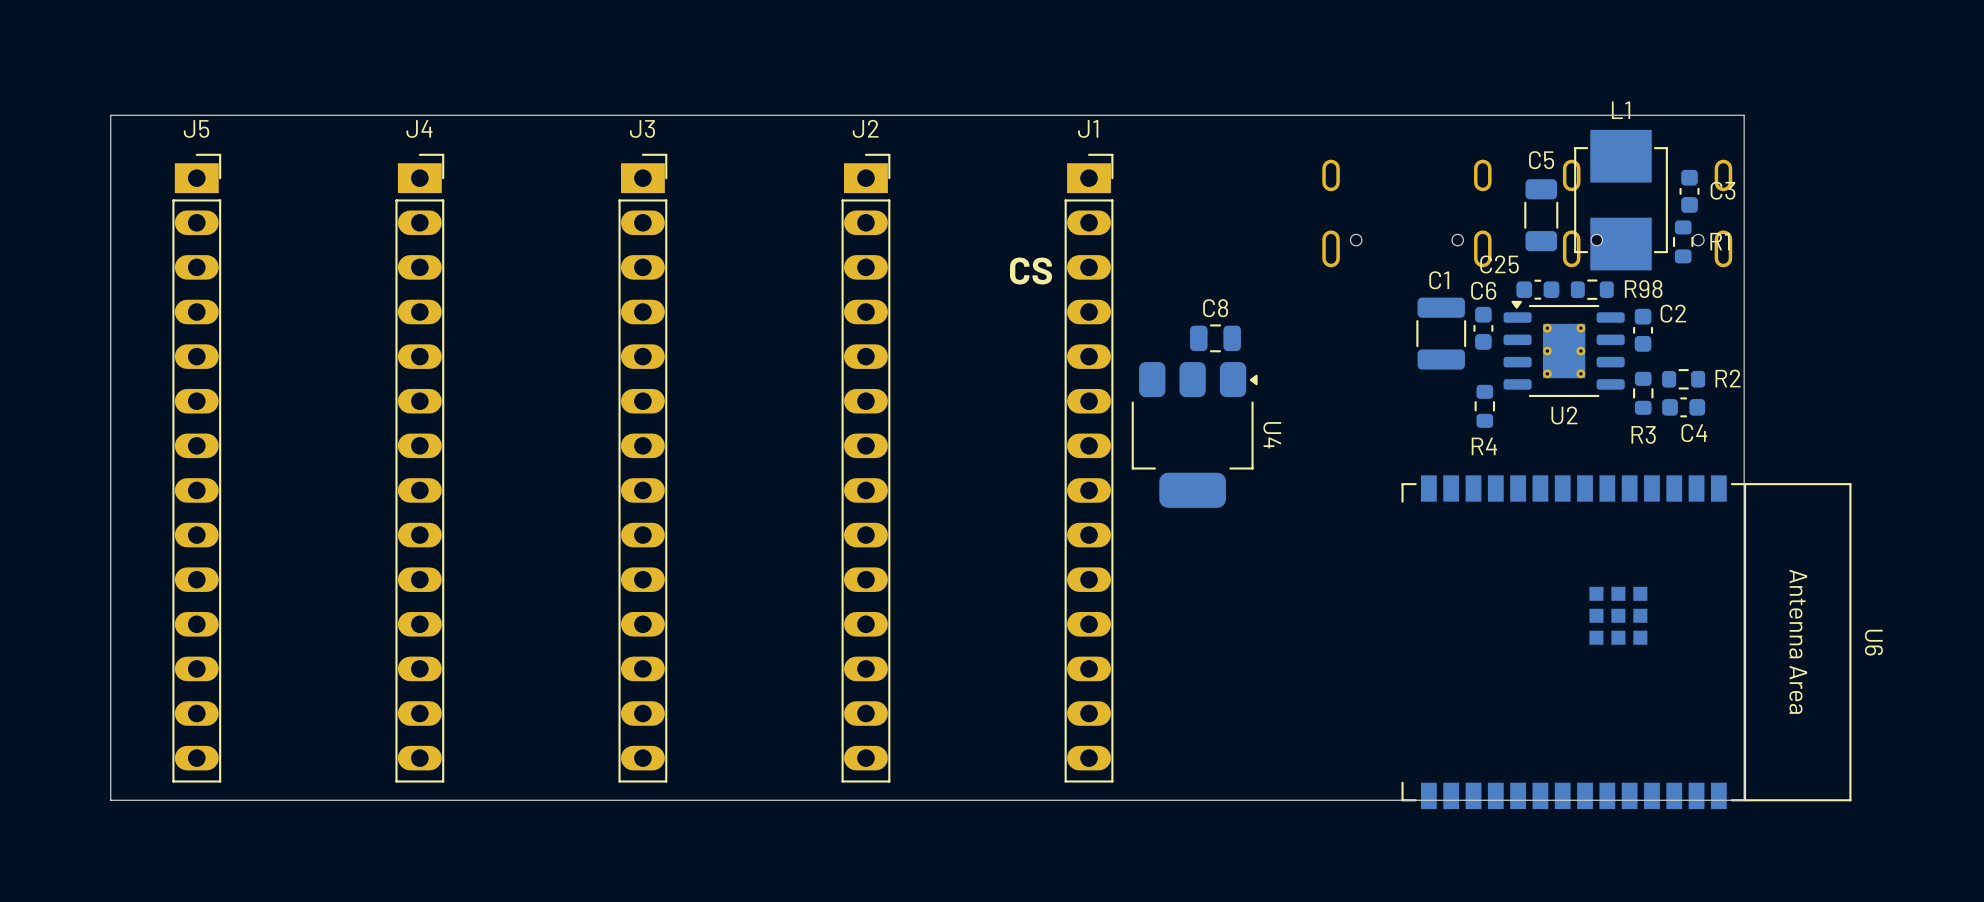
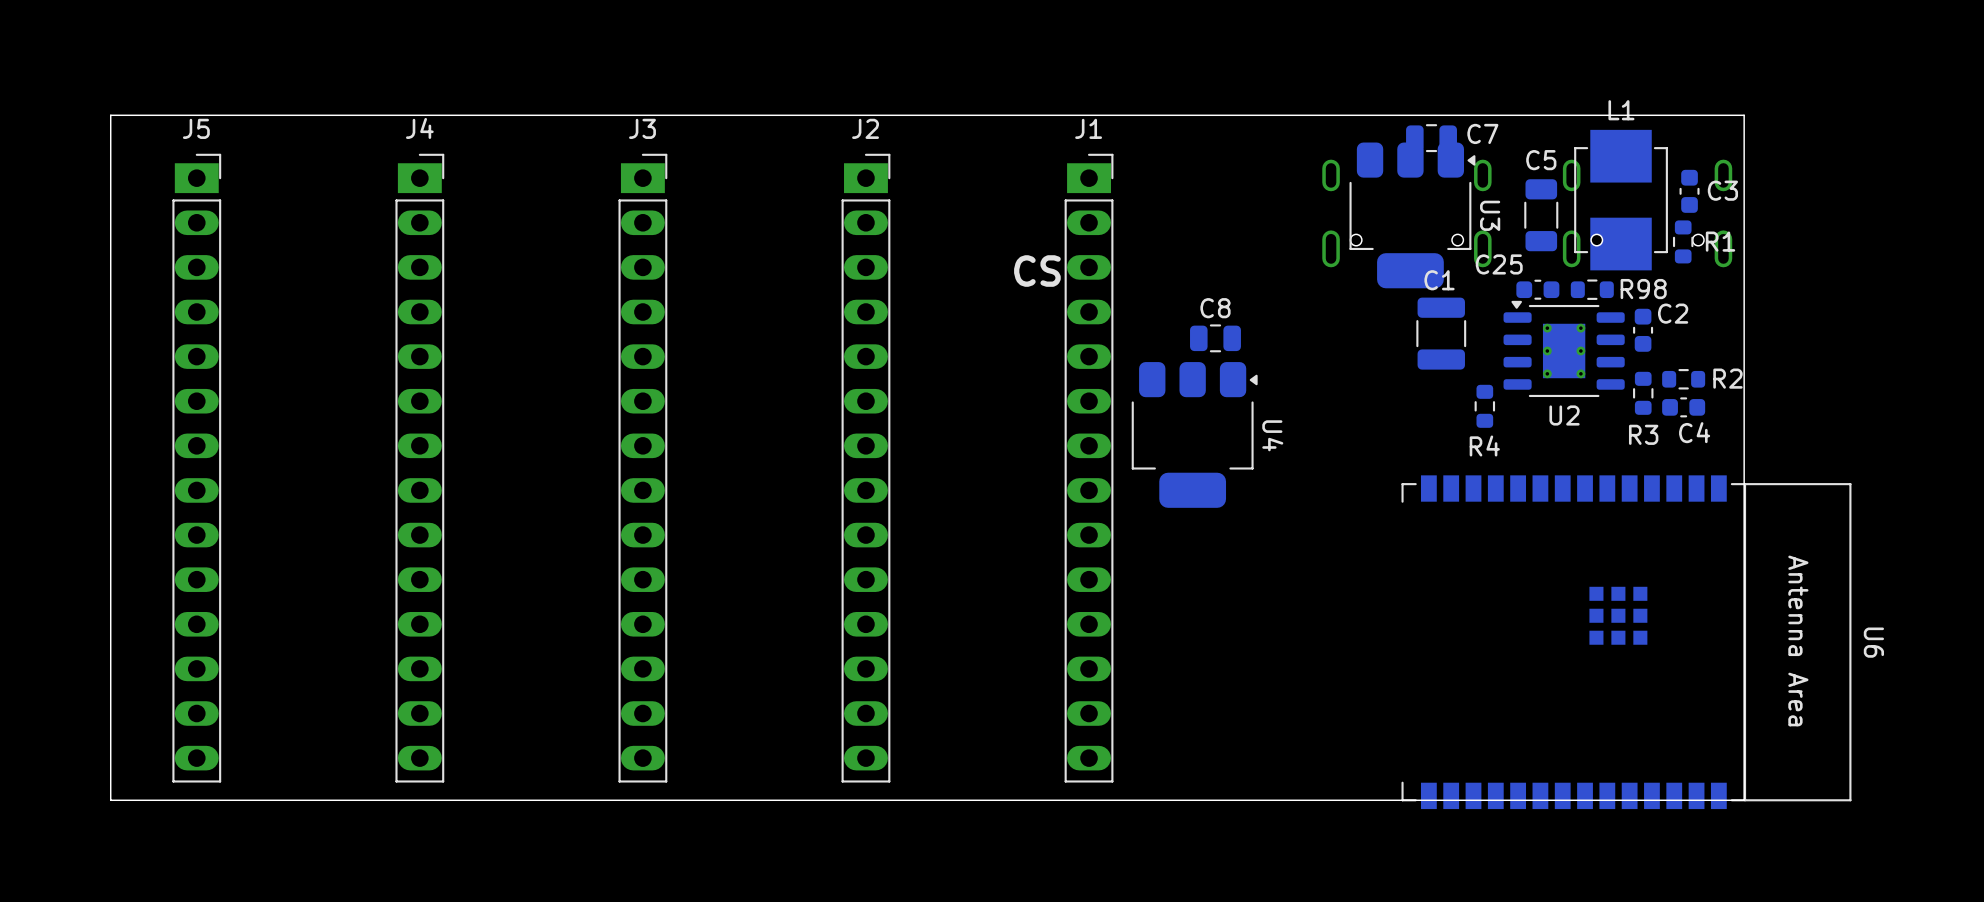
C7: none -> (1431, 138)
U3: none -> (1412, 215)
C6: (1483, 328) -> none

